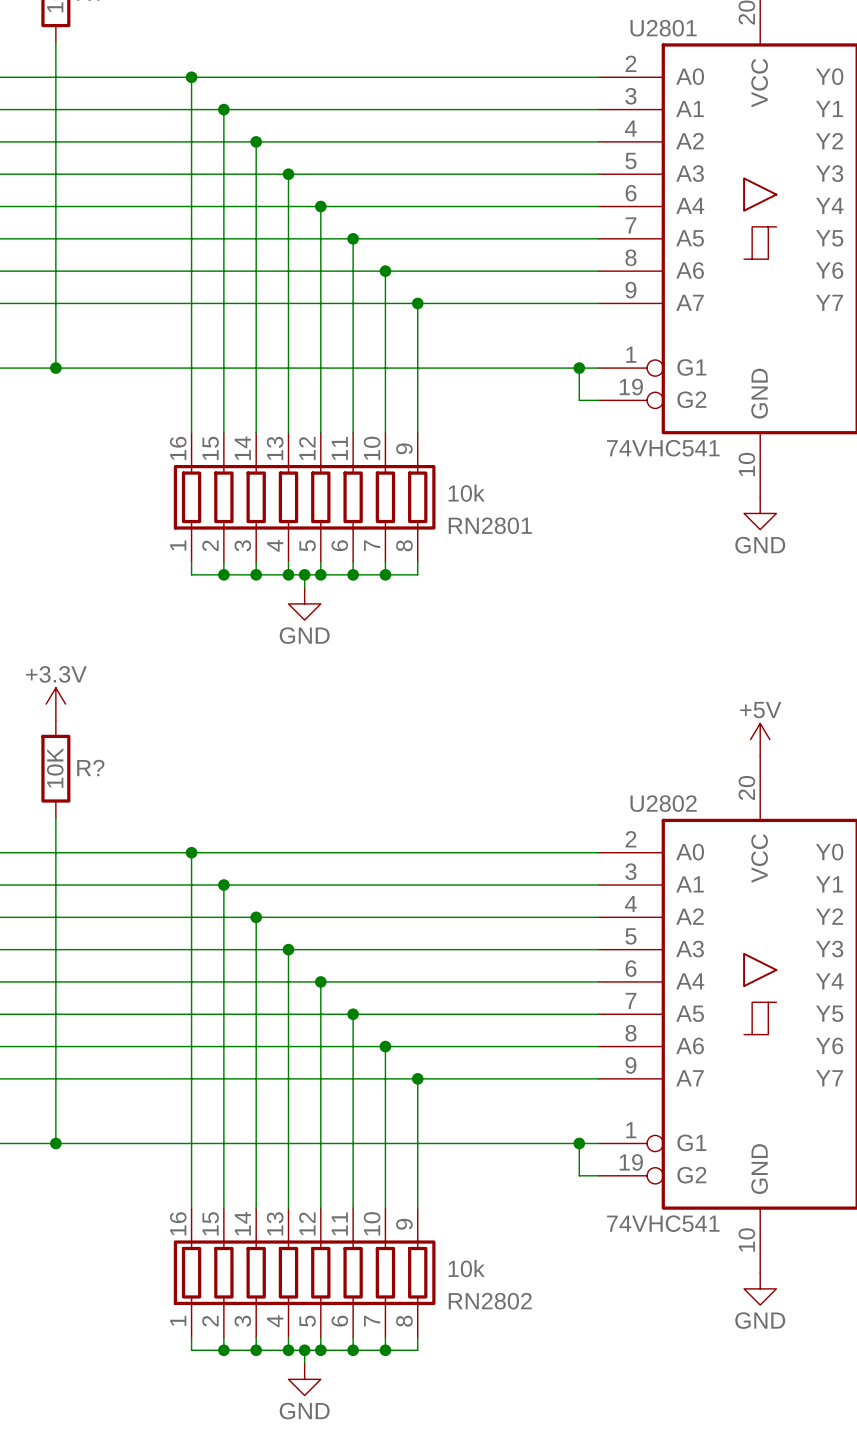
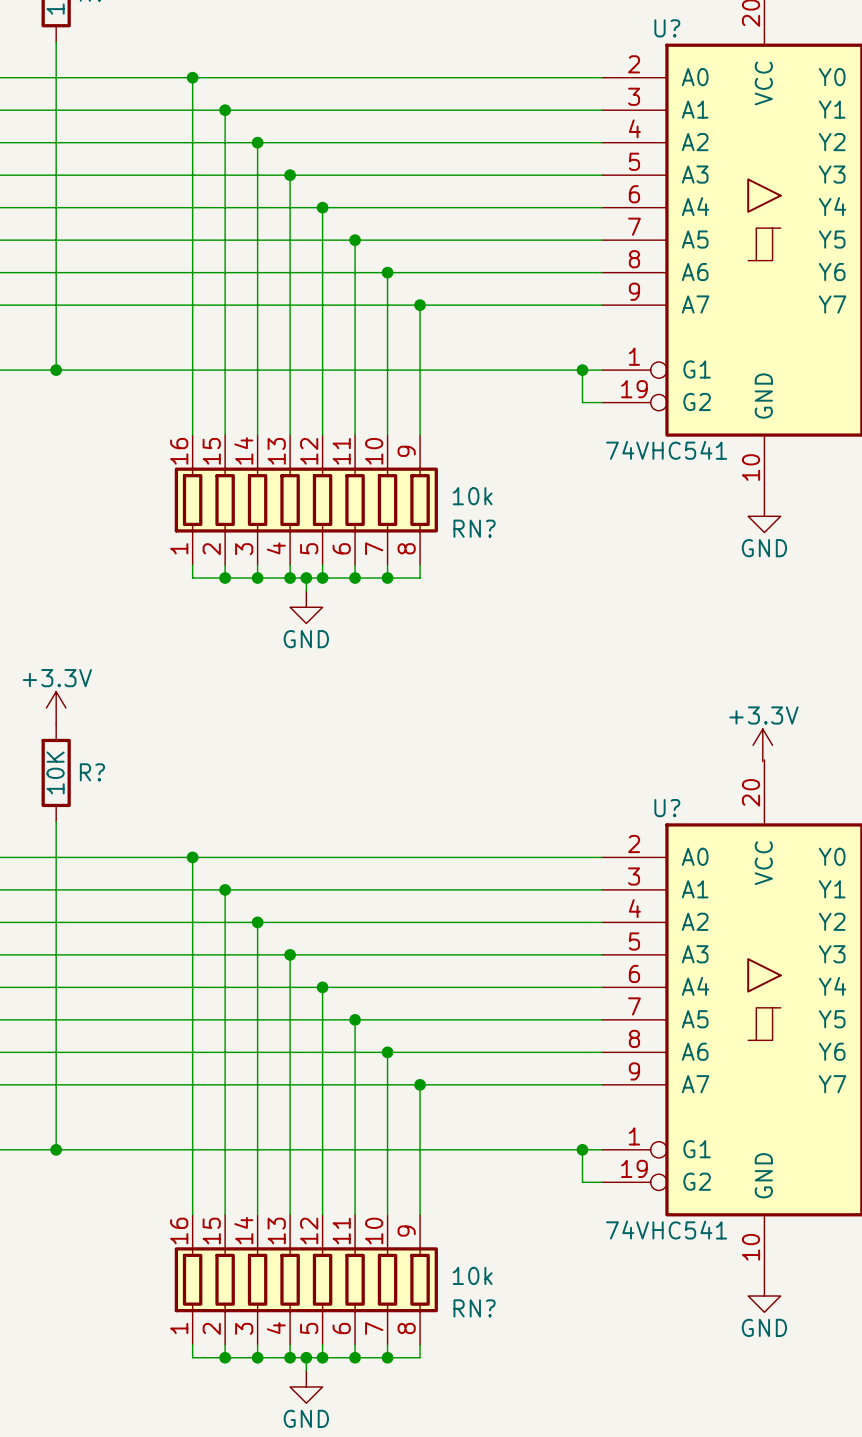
U2801 name: U2801 (663, 28) -> U? (667, 28)
RN2801 name: RN2801 (490, 525) -> RN? (474, 528)
power symbol: +5V (760, 739) -> +3.3V (762, 745)
U2802 name: U2802 (663, 803) -> U? (667, 808)
RN2802 name: RN2802 (490, 1301) -> RN? (474, 1308)

